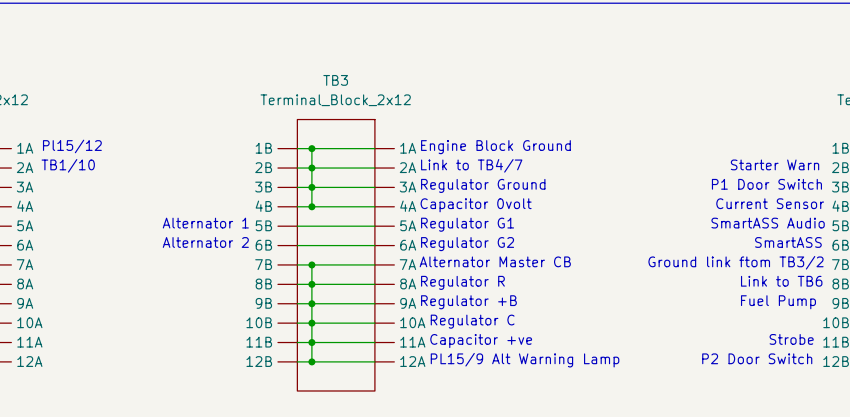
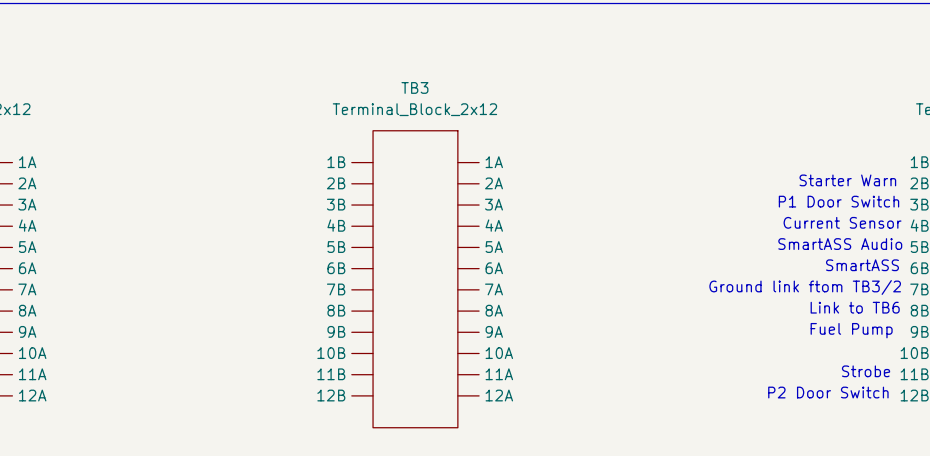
text: Pl15/12 (72, 146) -> none
text: Engine Block Ground (495, 147) -> none
wire: (297, 148) (374, 148) -> none
wire: (311, 148) (311, 206) -> none
junction: (311, 148) -> none
text: TB1/10 (68, 165) -> none
text: Link to TB4/7 (471, 165) -> none
wire: (297, 168) (374, 168) -> none
junction: (311, 168) -> none
text: Regulator Ground (483, 185) -> none
wire: (297, 187) (374, 187) -> none
junction: (311, 187) -> none
text: Capacitor 0volt (476, 205) -> none
wire: (297, 206) (374, 206) -> none
junction: (311, 206) -> none
text: Alternator 1 (205, 223) -> none
text: Regulator G1 (467, 224) -> none
wire: (297, 226) (374, 226) -> none
text: Alternator 2 (205, 242) -> none
text: Regulator G2 (467, 244) -> none
wire: (297, 245) (374, 245) -> none
TB3 position: (336, 255) -> (415, 279)
text: Alternator Master CB (495, 261) -> none
wire: (297, 264) (374, 264) -> none
wire: (311, 264) (311, 361) -> none
junction: (311, 264) -> none
text: Regulator R (462, 282) -> none
wire: (297, 284) (374, 284) -> none
junction: (311, 284) -> none
text: Regulator +B (468, 302) -> none
wire: (297, 303) (374, 303) -> none
junction: (311, 303) -> none
text: Regulator C (472, 321) -> none
wire: (297, 323) (374, 323) -> none
junction: (311, 323) -> none
text: Capacitor +ve (481, 341) -> none
wire: (297, 342) (374, 342) -> none
junction: (311, 342) -> none
text: PL15/9 Alt Warning Lamp (525, 360) -> none
wire: (297, 361) (374, 361) -> none
junction: (311, 361) -> none

